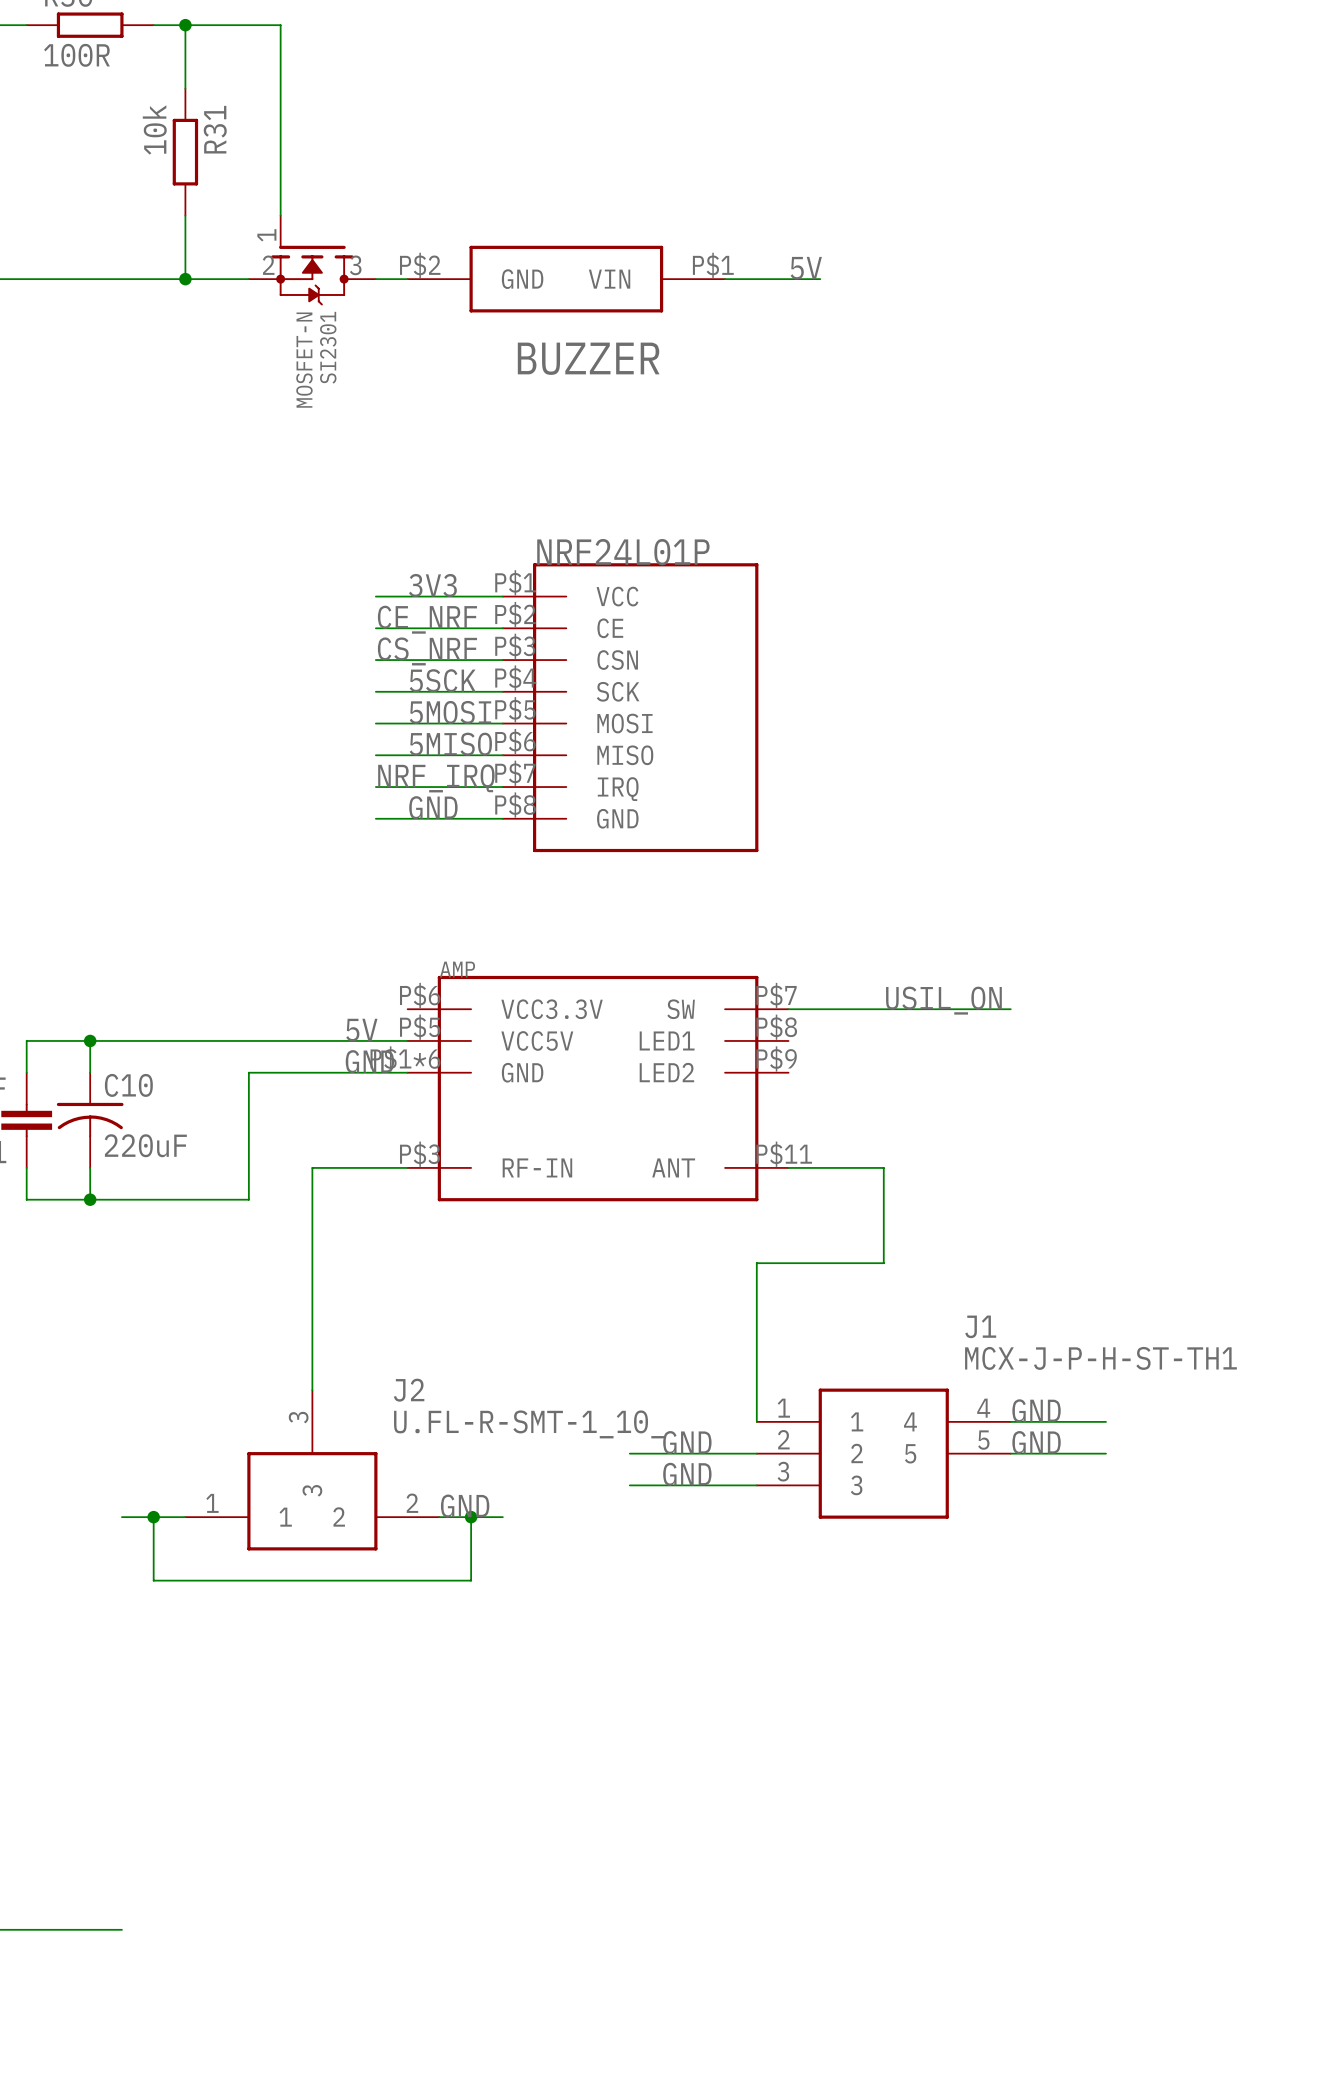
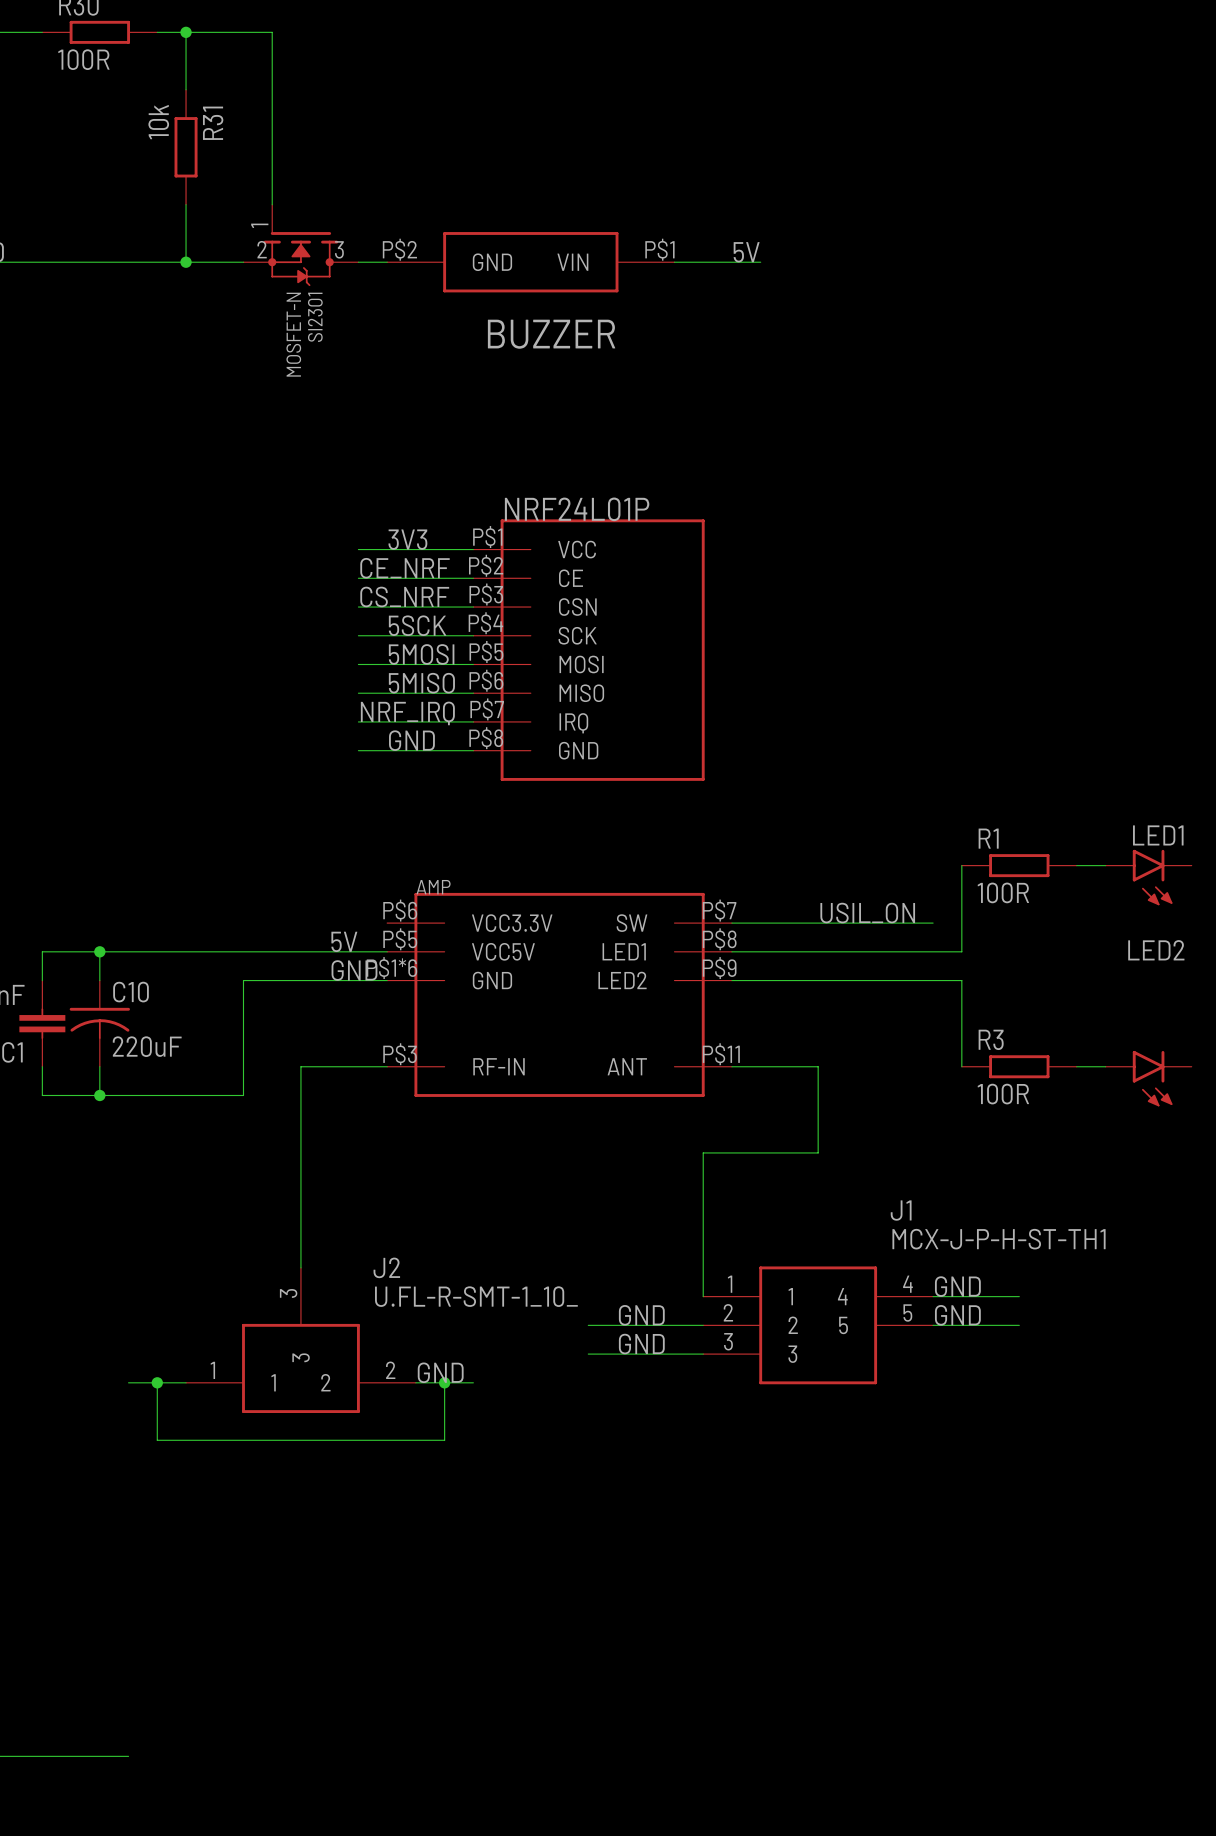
wire: none -> (961, 865) (961, 951) (731, 951)
R1: none -> 100R (1019, 865)
wire: none -> (1076, 865) (1105, 865)
LED1: none -> (1148, 877)
wire: none -> (731, 980) (961, 980) (961, 1066)
R3: none -> 100R (1019, 1066)
wire: none -> (1076, 1066) (1105, 1066)
LED2: none -> (1148, 1078)

